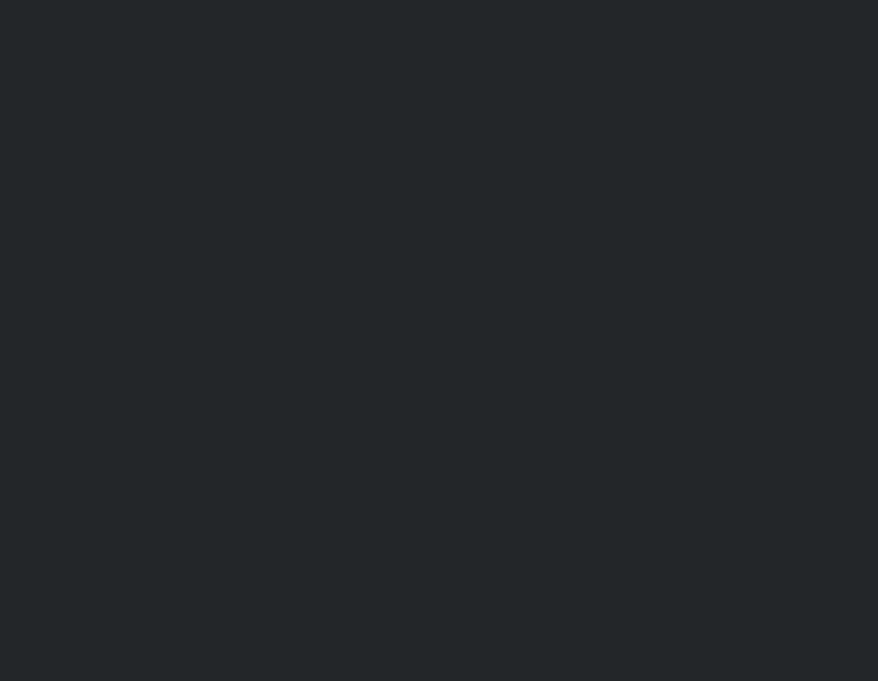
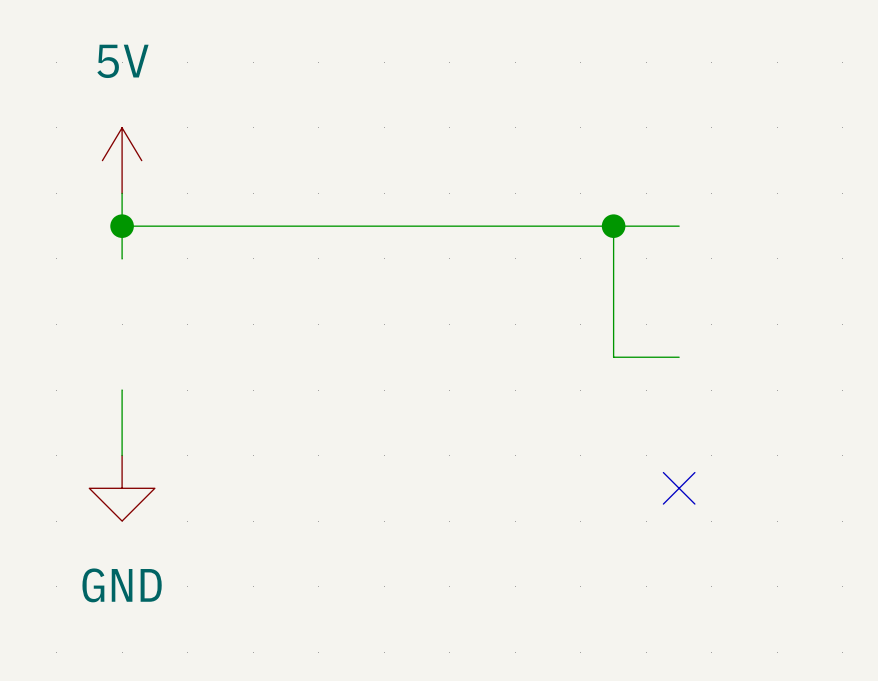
power symbol: none -> 5V (122, 160)
wire: none -> (122, 193) (122, 258)
wire: none -> (122, 226) (679, 226)
junction: none -> (122, 226)
wire: none -> (613, 226) (613, 357) (679, 357)
junction: none -> (613, 226)
wire: none -> (122, 390) (122, 455)
power symbol: none -> GND (122, 488)
no-connect mark: none -> (679, 488)

